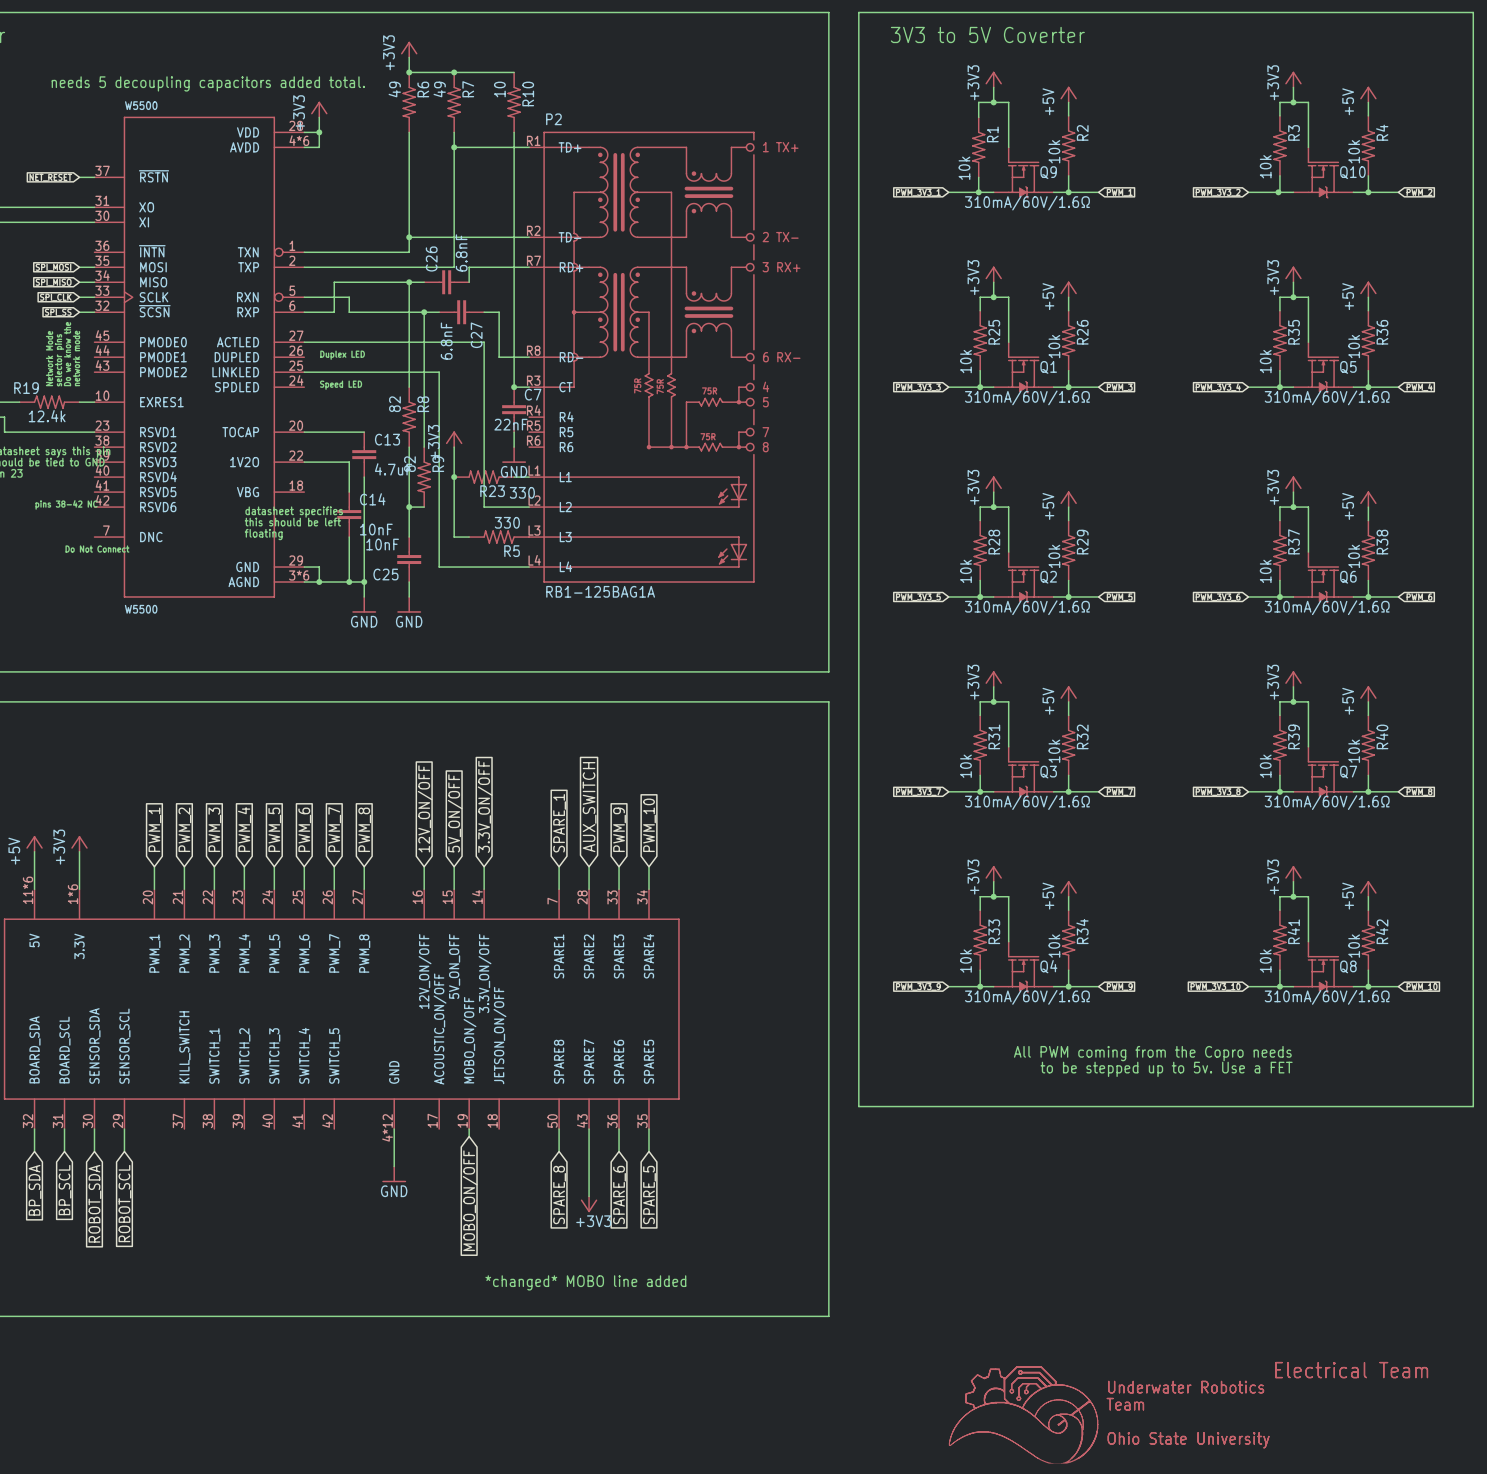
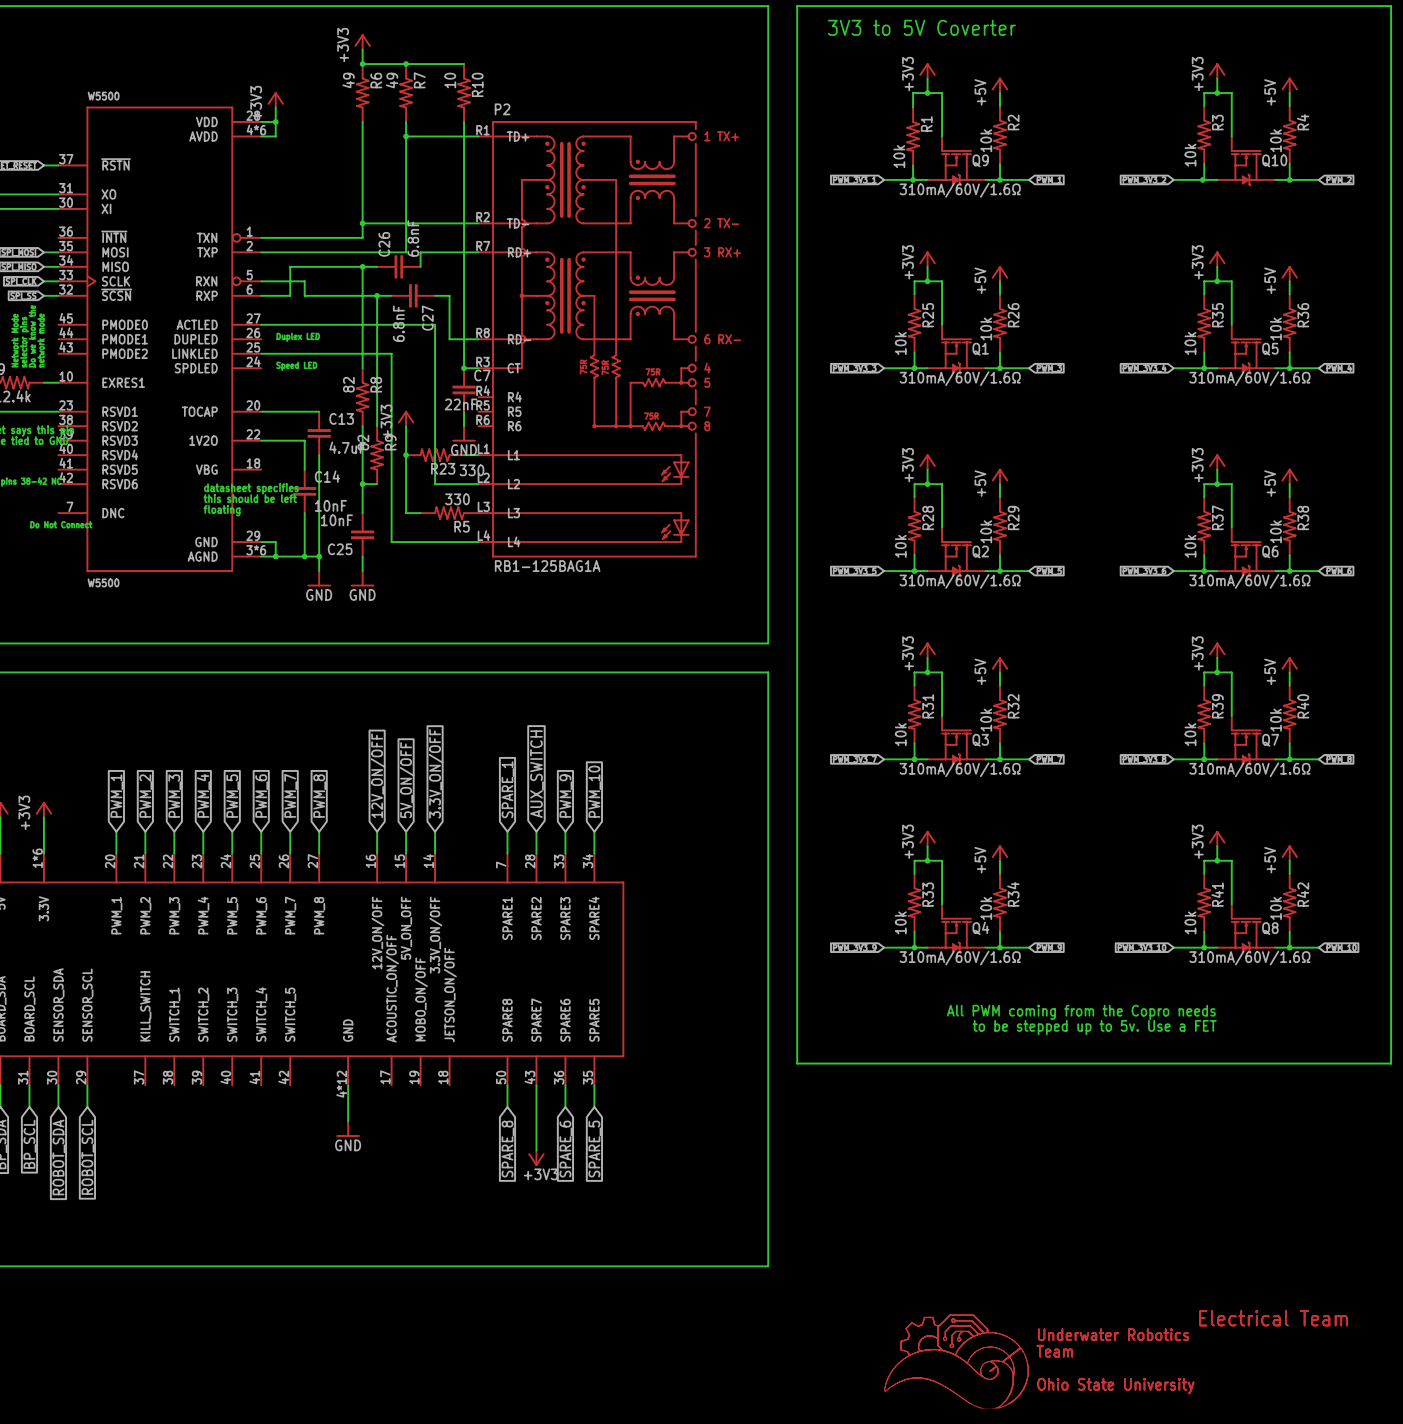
text: needs 5 decoupling capacitors added total. (208, 83) -> none
wire: (469, 1129) (469, 1136) -> none
global label: MOBO_ON/OFF (470, 1200) -> none
text: *changed* MOBO line added (585, 1282) -> none

